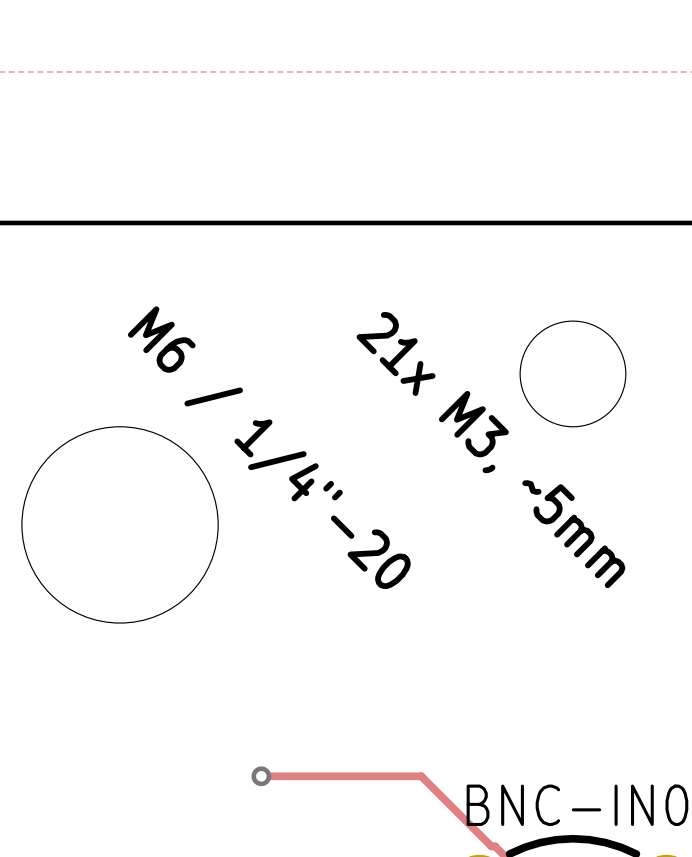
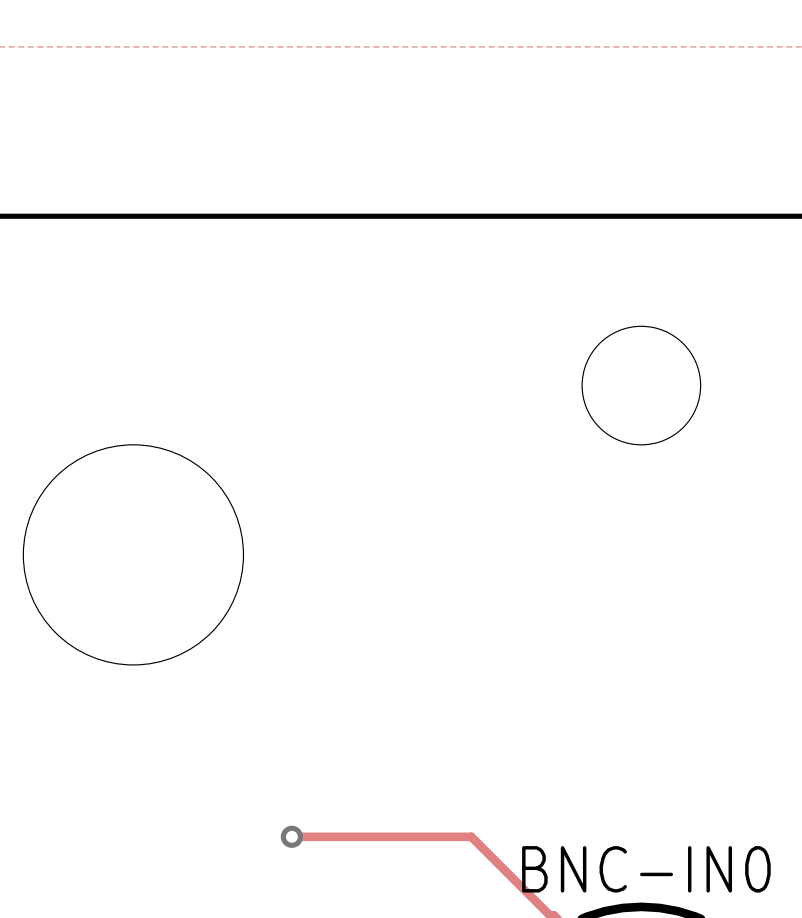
text: M6 / 1/4"-20 (269, 447) -> none
text: 21x M3, ~5mm (490, 450) -> none

